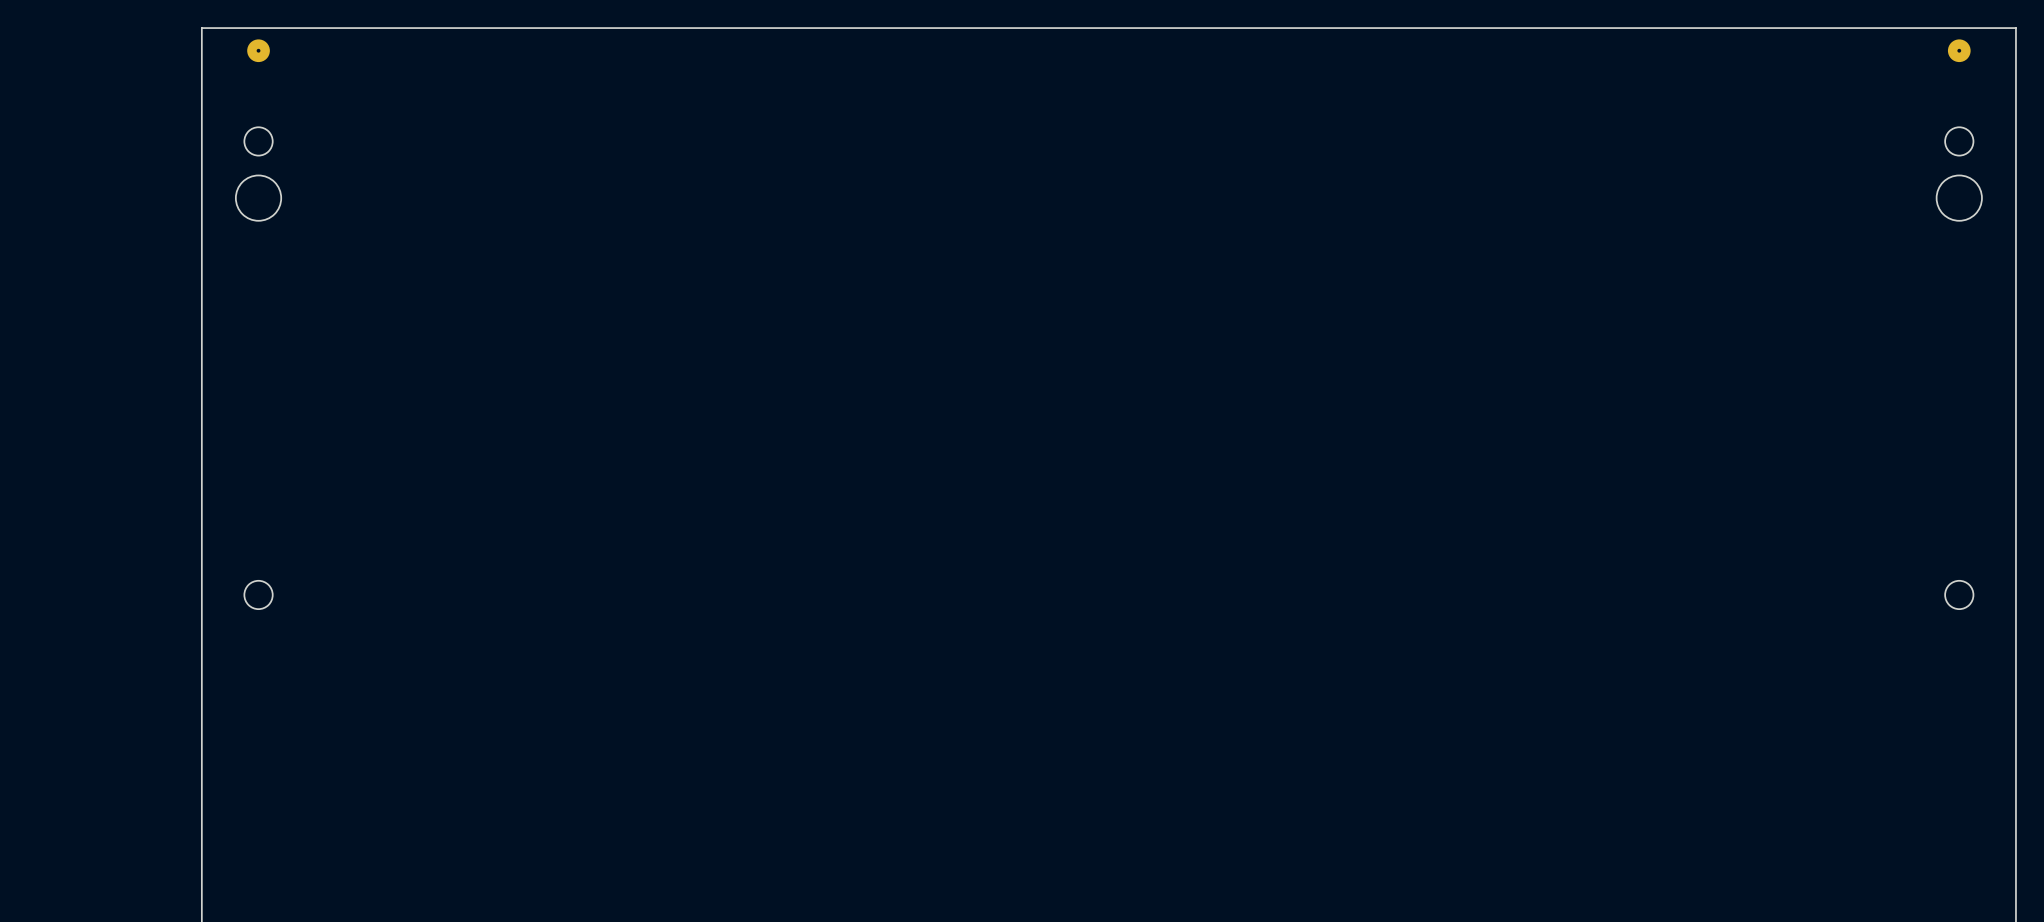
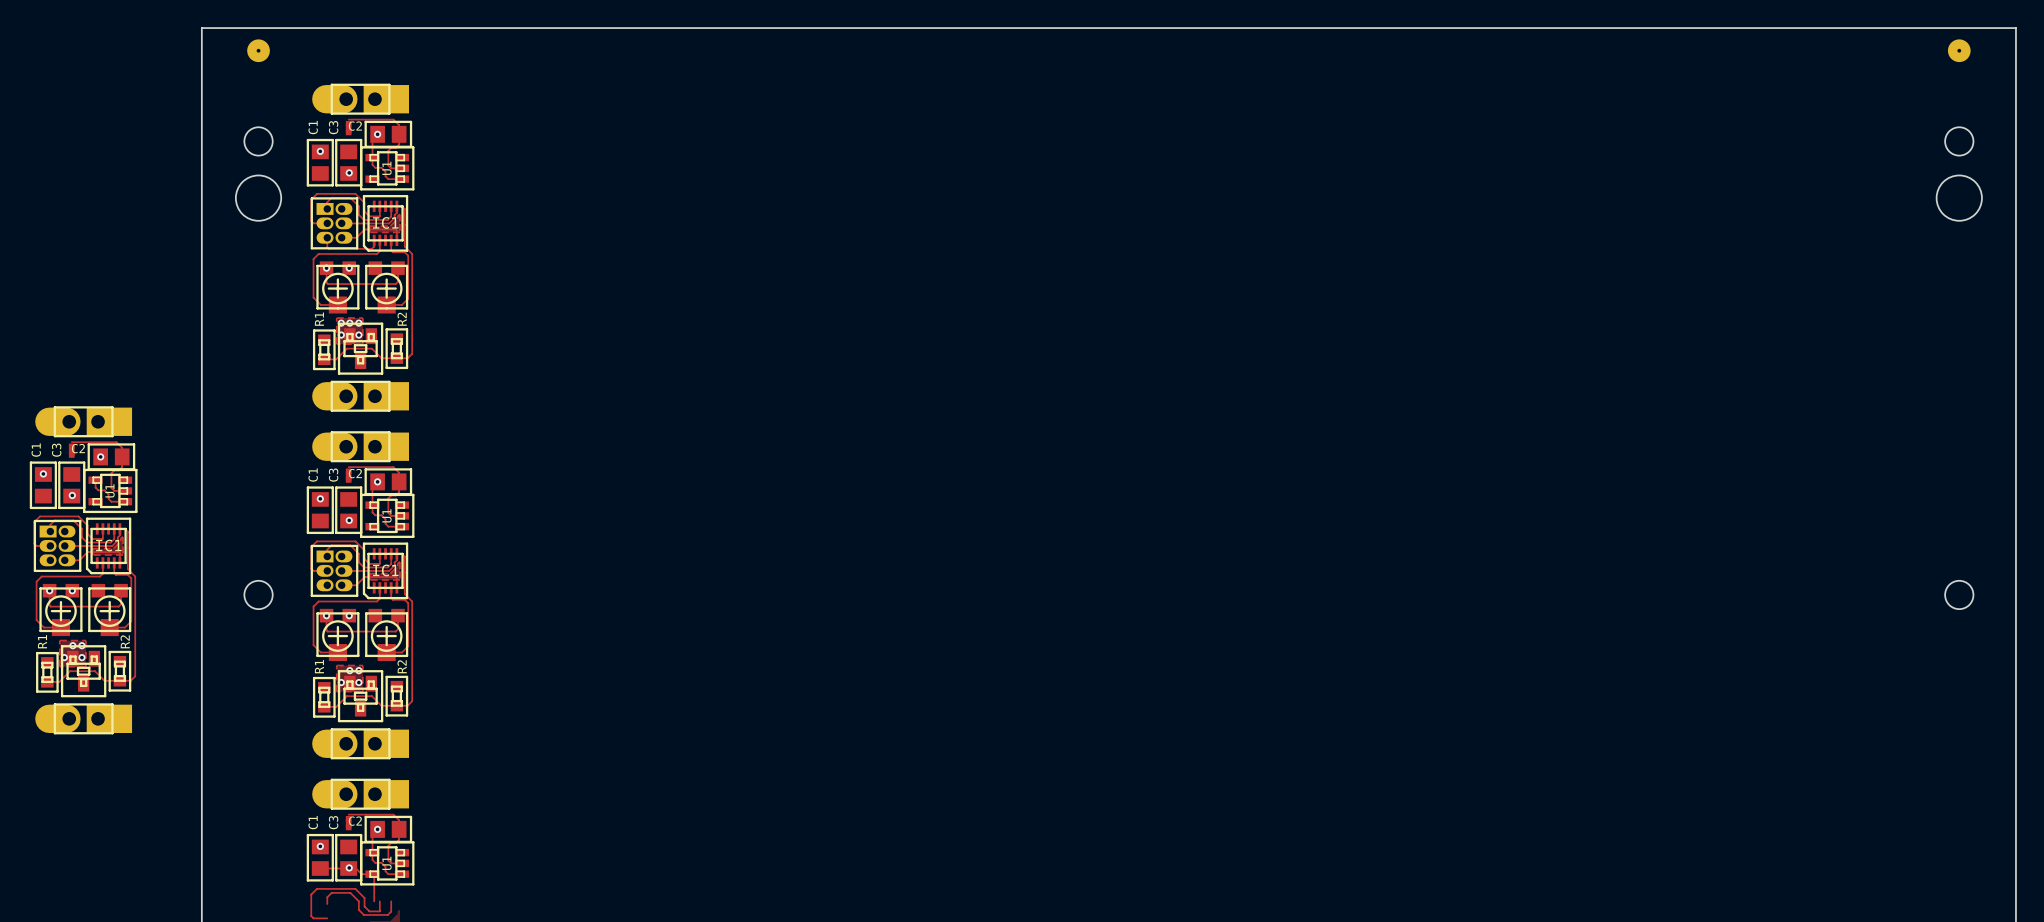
part: none -> (360, 99)
track: none -> (348, 119) (393, 119) (399, 125) (399, 144) (388, 150) (388, 165) (391, 168) (401, 168)
part: none -> (348, 128)
track: none -> (377, 134) (372, 139) (372, 164) (375, 167) (381, 167) (388, 179) (401, 179)
via: none -> (377, 134)
C2: none -> (388, 134)
via: none -> (320, 151)
C1: none -> (320, 162)
C3: none -> (348, 162)
U1: none -> (387, 168)
via: none -> (349, 172)
track: none -> (379, 206) (379, 216) (369, 216) (364, 211) (364, 202) (355, 193) (316, 193) (311, 199) (311, 221) (313, 223) (327, 223)
track: none -> (391, 206) (391, 216) (387, 219) (363, 219) (358, 214) (358, 206) (350, 197) (331, 197) (327, 202) (327, 208)
zone outline: none -> (399, 214) (390, 226) (369, 226) (369, 232) (399, 232) (399, 214)
part: none -> (334, 223)
track: none -> (341, 223) (389, 223) (394, 217) (396, 206) (401, 206) (404, 209) (404, 246) (412, 253) (412, 353) (407, 358) (381, 358) (371, 348) (346, 348) (336, 359) (320, 359)
IC1: none -> (385, 223)
track: none -> (327, 237) (328, 248) (371, 248) (374, 246) (374, 240)
track: none -> (341, 237) (356, 237) (364, 229) (395, 229) (396, 240)
track: none -> (379, 240) (379, 251) (377, 253) (318, 253) (313, 259) (313, 297) (320, 304) (337, 304)
track: none -> (391, 240) (392, 252) (404, 252) (408, 255) (408, 298) (401, 304) (386, 304)
track: none -> (326, 268) (327, 284) (395, 284) (398, 281) (398, 268)
via: none -> (326, 268)
via: none -> (349, 268)
part: none -> (337, 287)
part: none -> (386, 287)
zone outline: none -> (336, 318) (336, 344) (362, 344) (362, 318) (336, 318)
via: none -> (341, 323)
via: none -> (349, 323)
via: none -> (358, 323)
via: none -> (341, 335)
via: none -> (358, 335)
part: none -> (360, 348)
R2: none -> (396, 348)
R1: none -> (324, 349)
part: none -> (360, 396)
part: none -> (83, 421)
track: none -> (71, 442) (116, 442) (122, 447) (122, 467) (111, 473) (111, 488) (114, 490) (125, 490)
part: none -> (360, 446)
part: none -> (71, 450)
via: none -> (100, 456)
C2: none -> (111, 456)
track: none -> (348, 467) (393, 467) (399, 472) (399, 492) (388, 498) (388, 513) (391, 515) (401, 515)
via: none -> (43, 473)
part: none -> (348, 475)
track: none -> (95, 480) (95, 487) (98, 490) (104, 490) (111, 501) (125, 501)
track: none -> (377, 481) (372, 486) (372, 512) (375, 515) (381, 515) (388, 526) (401, 526)
via: none -> (377, 481)
C2: none -> (388, 481)
C1: none -> (43, 485)
C3: none -> (71, 485)
U1: none -> (110, 490)
via: none -> (72, 495)
via: none -> (320, 498)
C1: none -> (320, 510)
C3: none -> (348, 510)
U1: none -> (387, 515)
via: none -> (349, 520)
track: none -> (102, 528) (102, 538) (92, 538) (87, 534) (87, 525) (78, 516) (39, 516) (34, 522) (34, 543) (36, 545) (50, 545)
track: none -> (114, 528) (114, 539) (110, 542) (87, 542) (81, 537) (81, 528) (73, 520) (54, 520) (50, 524) (50, 531)
zone outline: none -> (122, 537) (113, 548) (92, 548) (92, 555) (122, 555) (122, 537)
part: none -> (57, 545)
IC1: none -> (108, 545)
track: none -> (64, 546) (112, 546) (117, 540) (119, 528) (125, 528) (127, 531) (127, 569) (135, 576) (135, 676) (130, 680) (104, 680) (94, 671) (70, 671) (59, 681) (43, 681)
track: none -> (379, 553) (379, 563) (369, 563) (364, 558) (364, 550) (355, 541) (316, 541) (311, 547) (311, 568) (313, 570) (327, 570)
track: none -> (391, 553) (391, 564) (387, 567) (363, 567) (358, 562) (358, 553) (350, 545) (331, 545) (327, 549) (327, 556)
track: none -> (64, 560) (79, 560) (87, 552) (118, 552) (119, 562)
track: none -> (102, 562) (102, 573) (100, 576) (41, 576) (36, 581) (36, 620) (43, 627) (60, 627)
track: none -> (114, 562) (115, 574) (127, 574) (131, 578) (131, 621) (125, 627) (109, 627)
zone outline: none -> (399, 562) (390, 573) (369, 573) (369, 579) (399, 579) (399, 562)
part: none -> (334, 570)
track: none -> (341, 570) (389, 570) (394, 565) (396, 553) (401, 553) (404, 556) (404, 594) (412, 601) (412, 701) (407, 705) (381, 705) (371, 696) (346, 696) (336, 706) (320, 706)
IC1: none -> (385, 570)
track: none -> (341, 585) (356, 585) (364, 577) (395, 577) (396, 587)
track: none -> (379, 587) (379, 598) (377, 601) (318, 601) (313, 606) (313, 645) (320, 652) (337, 652)
track: none -> (391, 587) (392, 599) (404, 599) (408, 603) (408, 646) (401, 652) (386, 652)
track: none -> (49, 590) (50, 606) (118, 606) (121, 604) (121, 590)
via: none -> (49, 590)
via: none -> (72, 590)
part: none -> (60, 609)
part: none -> (109, 609)
track: none -> (326, 615) (327, 631) (395, 631) (398, 629) (398, 615)
via: none -> (326, 615)
via: none -> (349, 615)
part: none -> (337, 634)
part: none -> (386, 634)
zone outline: none -> (59, 640) (59, 666) (85, 666) (85, 640) (59, 640)
via: none -> (72, 645)
via: none -> (81, 645)
via: none -> (64, 657)
via: none -> (81, 657)
zone outline: none -> (336, 665) (336, 691) (362, 691) (362, 665) (336, 665)
via: none -> (349, 670)
via: none -> (358, 670)
part: none -> (83, 671)
R2: none -> (119, 671)
R1: none -> (47, 672)
via: none -> (341, 682)
via: none -> (358, 682)
part: none -> (360, 696)
R2: none -> (396, 696)
R1: none -> (324, 697)
part: none -> (83, 718)
part: none -> (360, 743)
part: none -> (360, 794)
track: none -> (348, 814) (393, 814) (399, 820) (399, 839) (388, 845) (388, 860) (391, 863) (401, 863)
part: none -> (348, 823)
track: none -> (377, 829) (372, 834) (372, 860) (375, 862) (381, 862) (388, 874) (401, 874)
via: none -> (377, 829)
C2: none -> (388, 829)
via: none -> (320, 846)
C1: none -> (320, 857)
C3: none -> (348, 857)
U1: none -> (387, 863)
via: none -> (349, 867)
track: none -> (320, 868) (356, 868) (361, 874) (372, 874) (374, 875) (374, 901)
track: none -> (379, 901) (379, 911) (369, 911) (364, 906) (364, 897) (355, 888) (316, 888) (311, 894) (311, 916) (313, 918) (327, 918)
track: none -> (391, 901) (391, 911) (387, 914) (363, 914) (358, 909) (358, 901) (350, 892) (331, 892) (327, 897) (327, 903)

